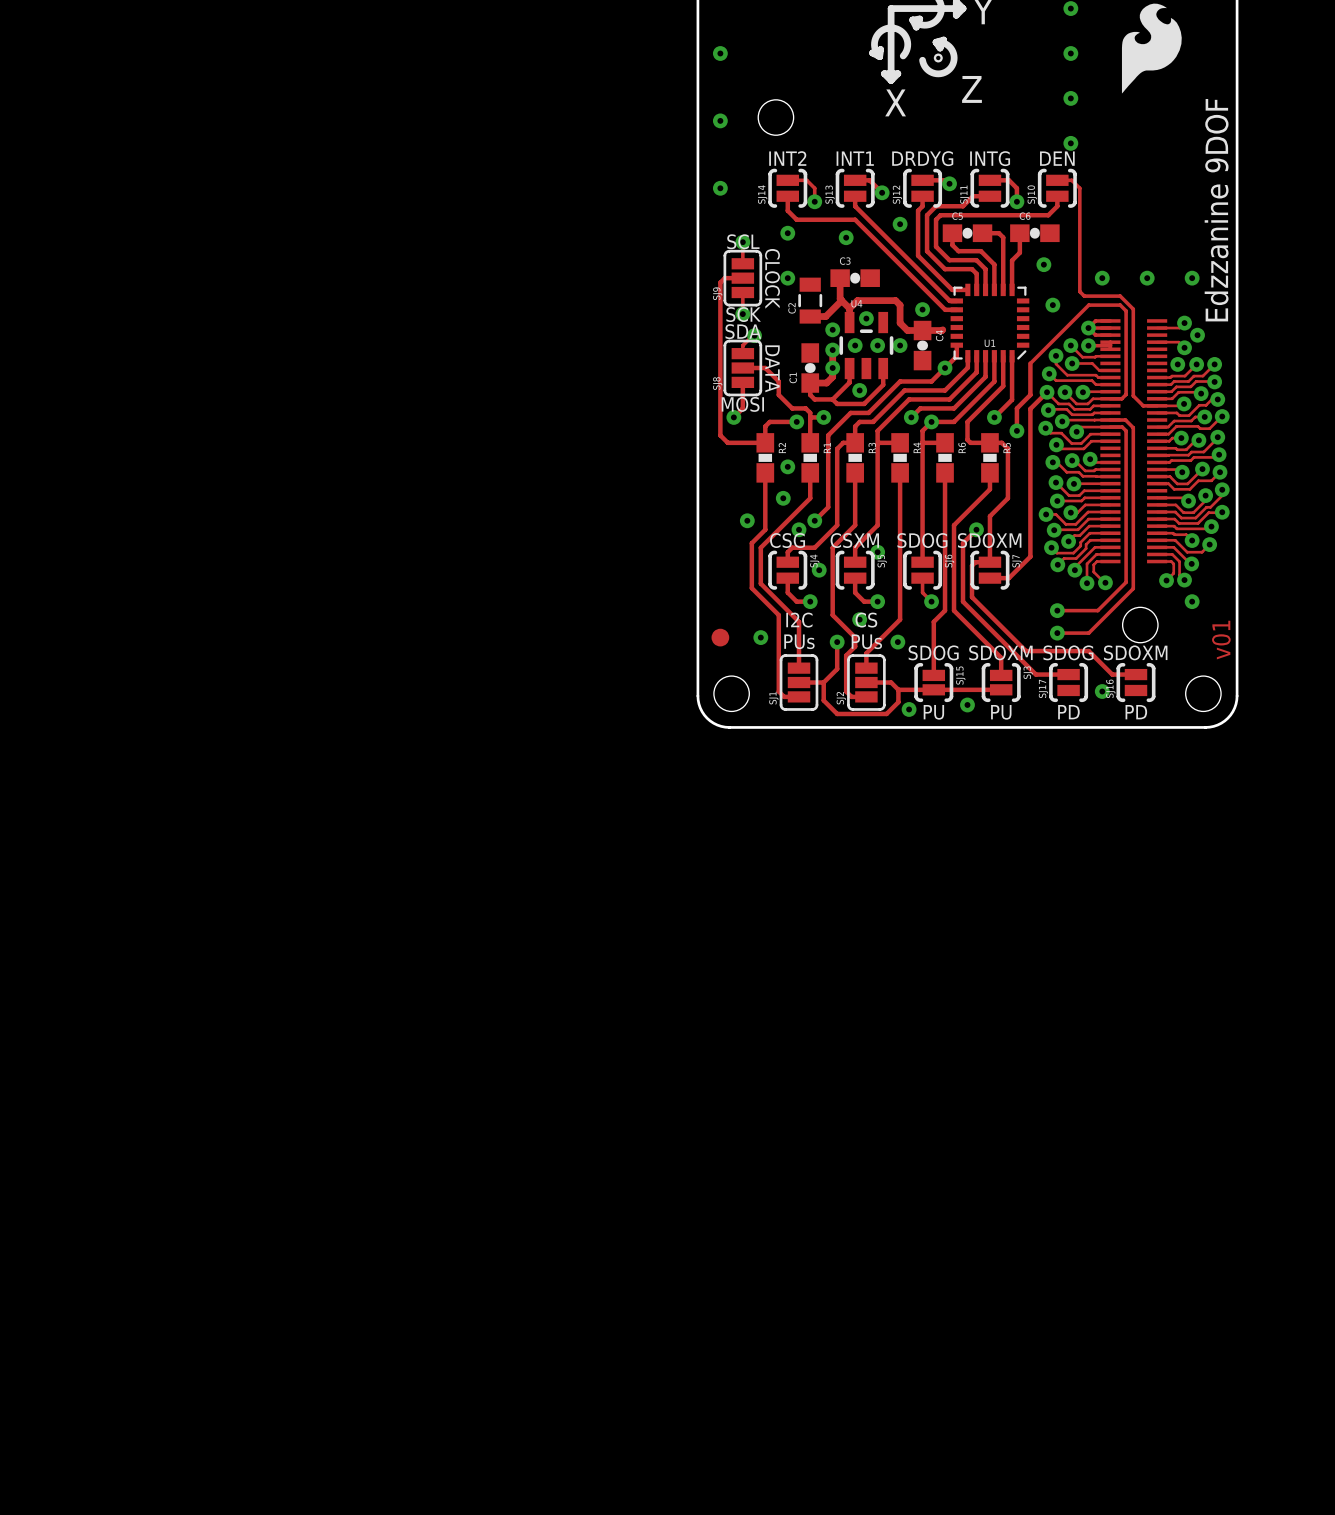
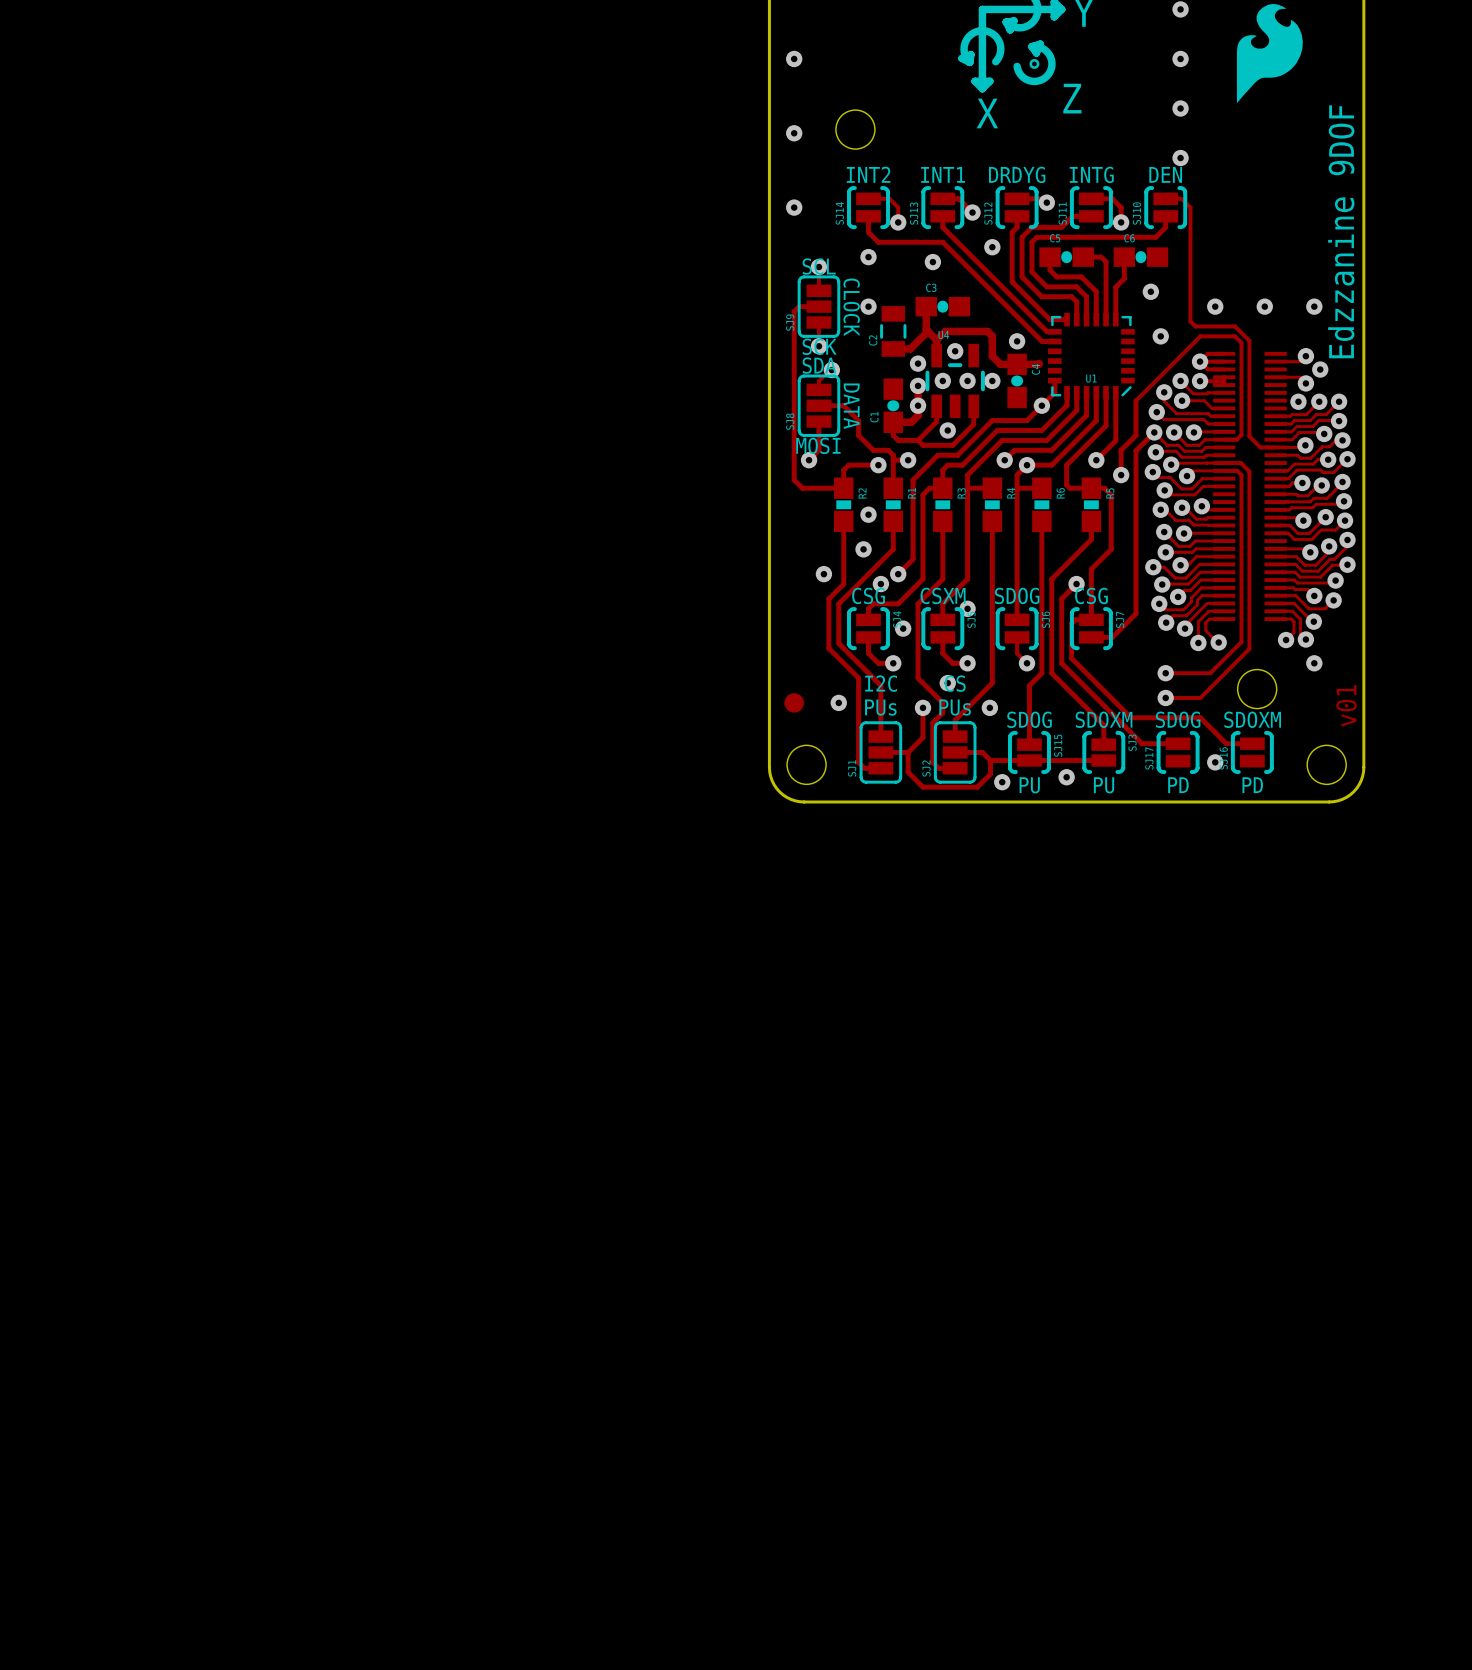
text: SDOXM (989, 540) -> CSG (1091, 595)

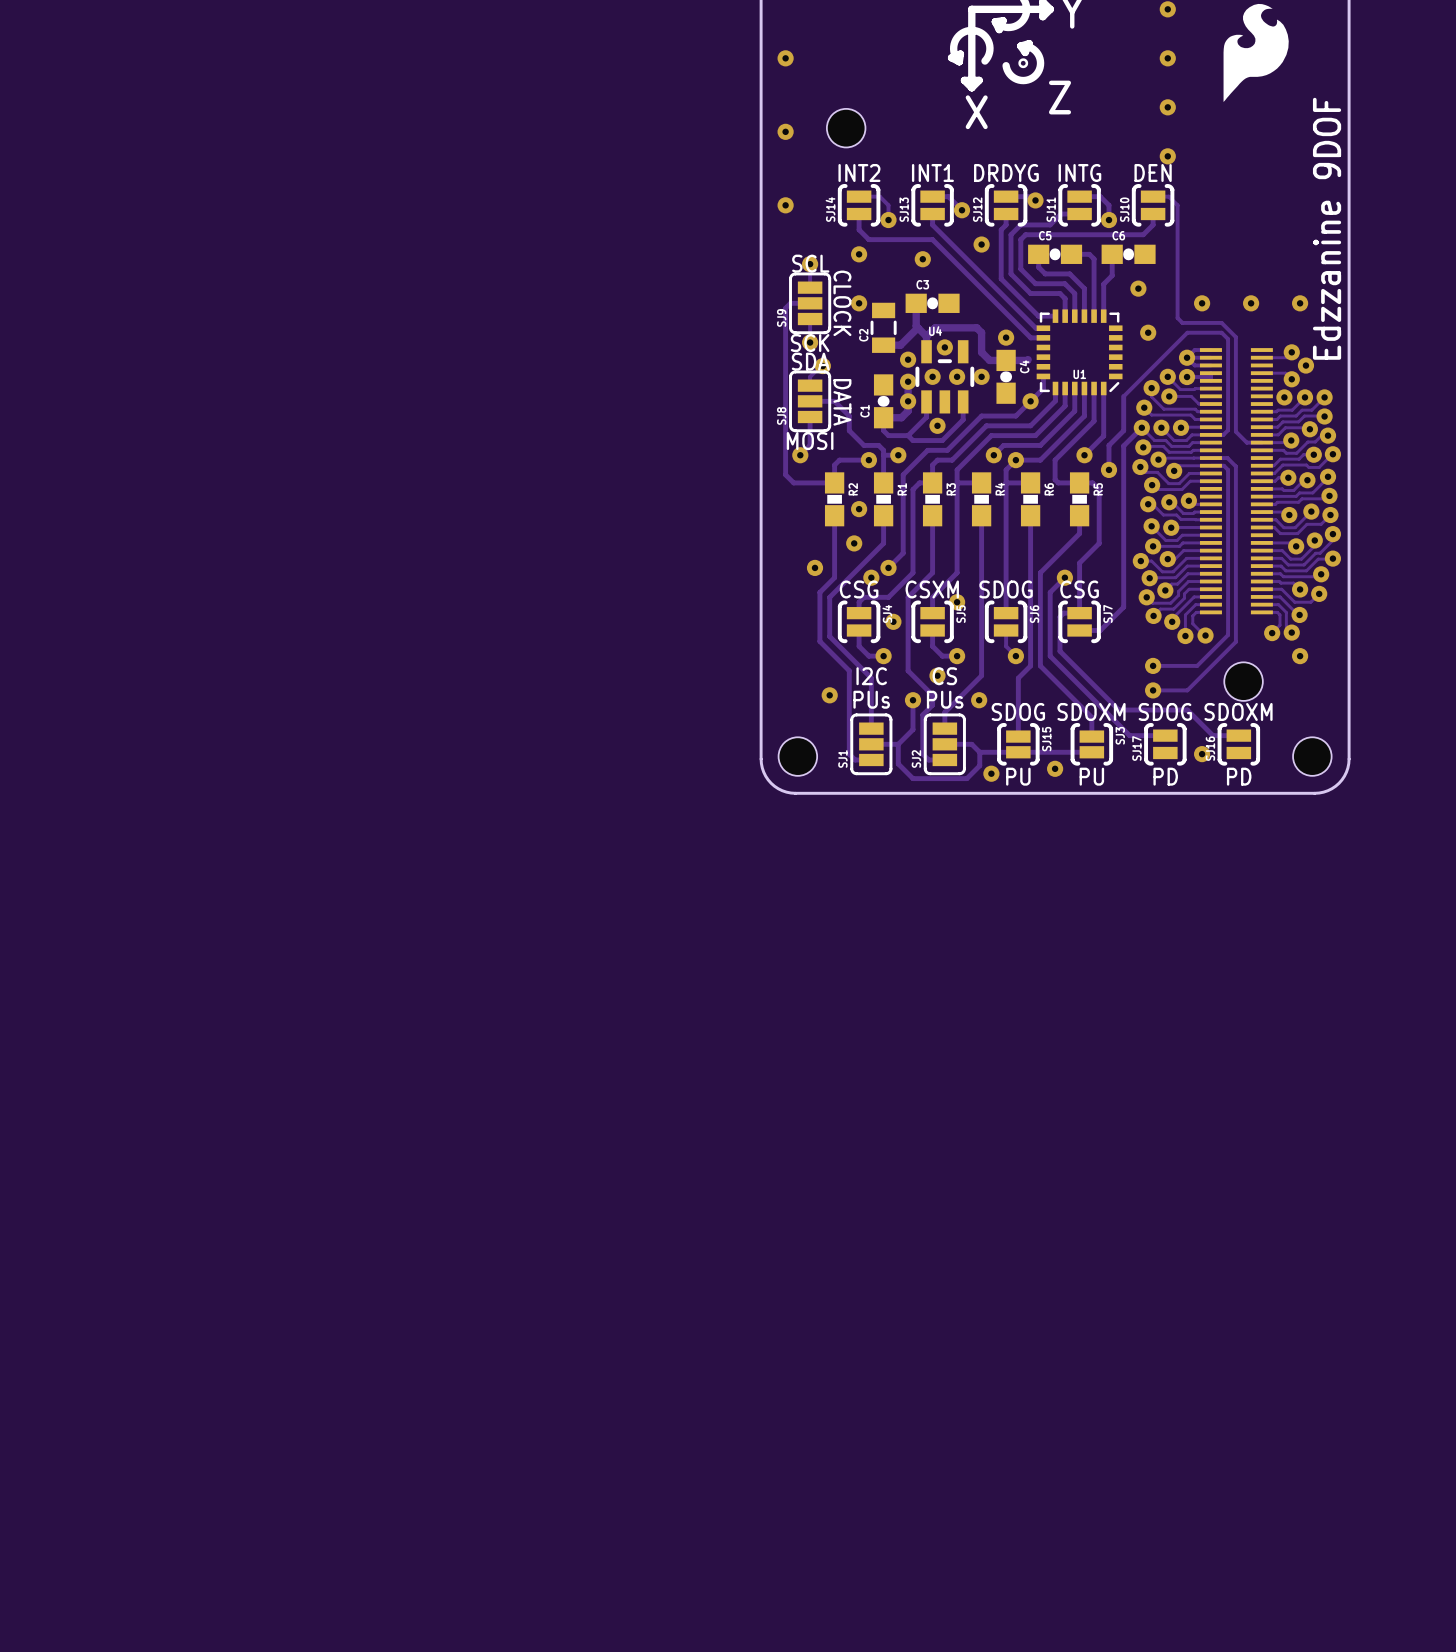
part: (794, 702) -> none
text: v01 (1346, 705) -> none

